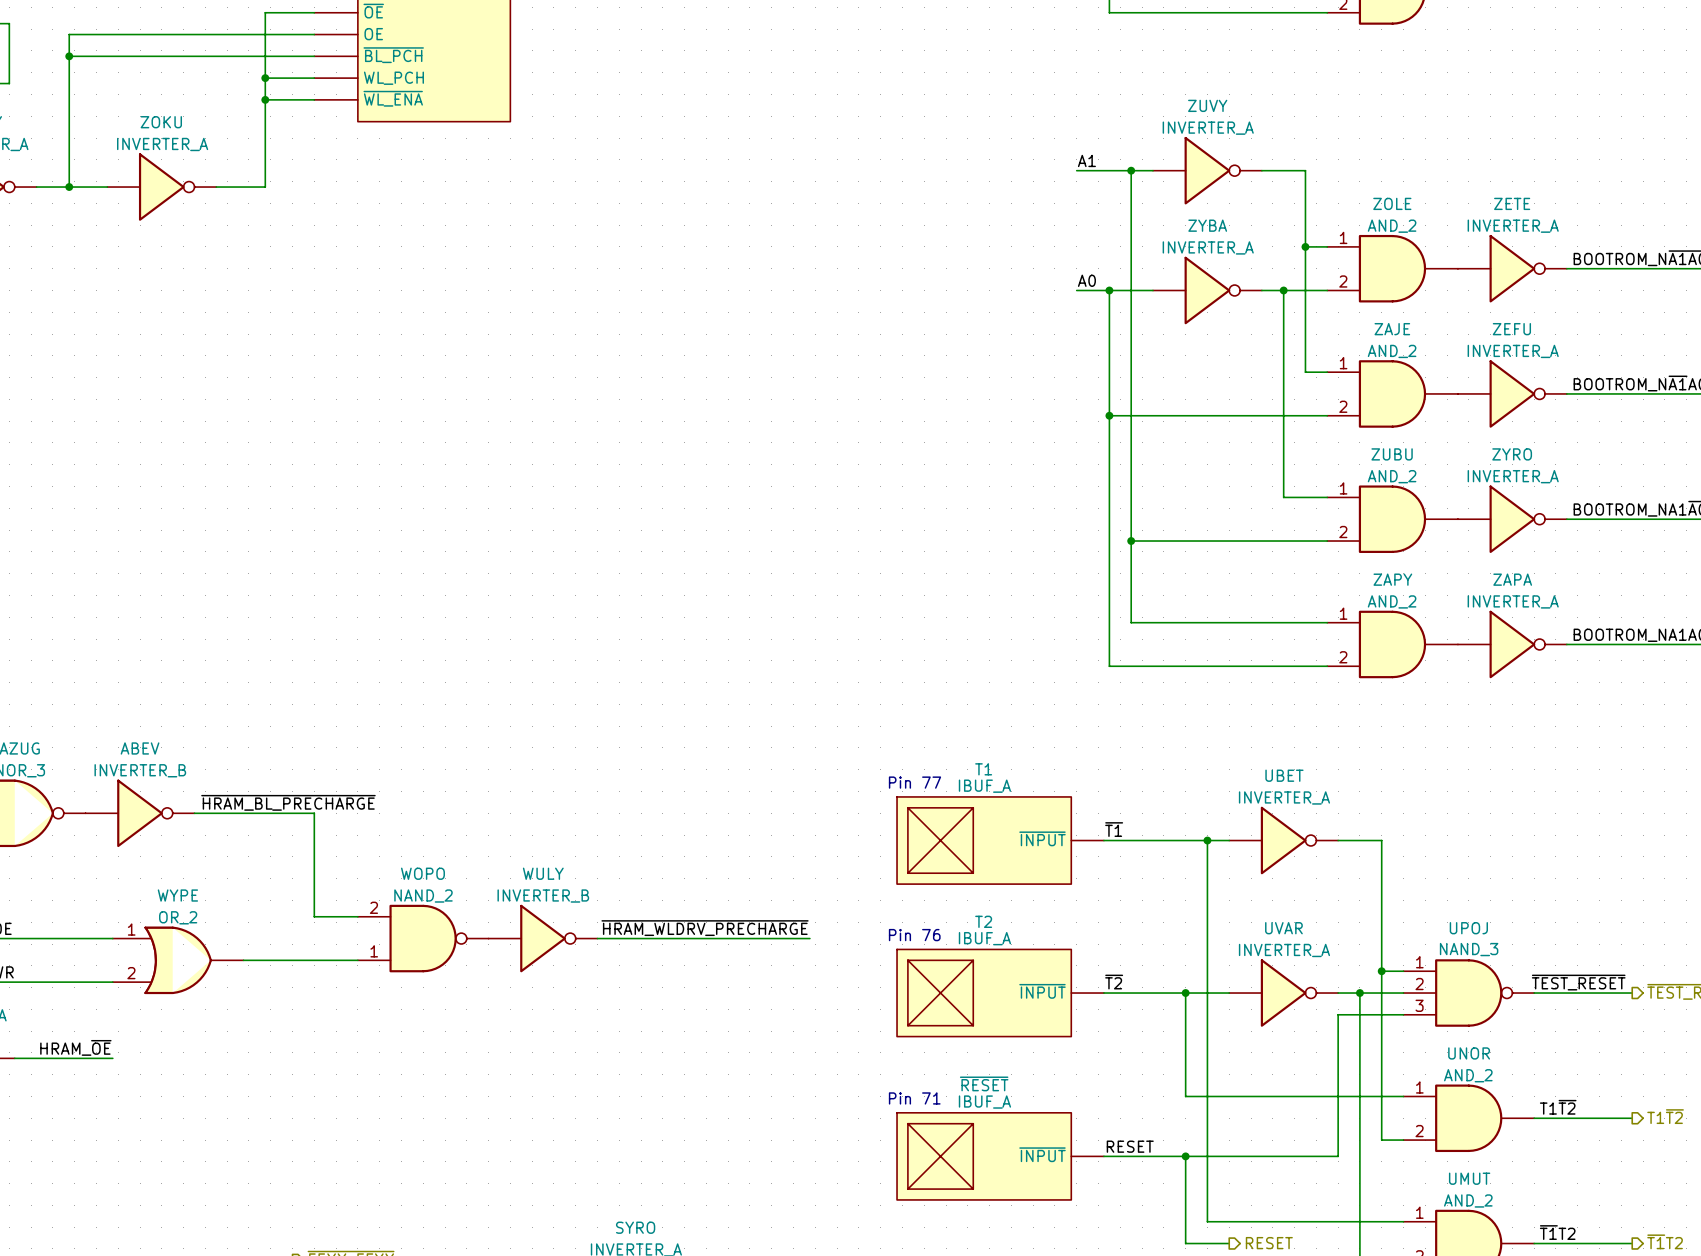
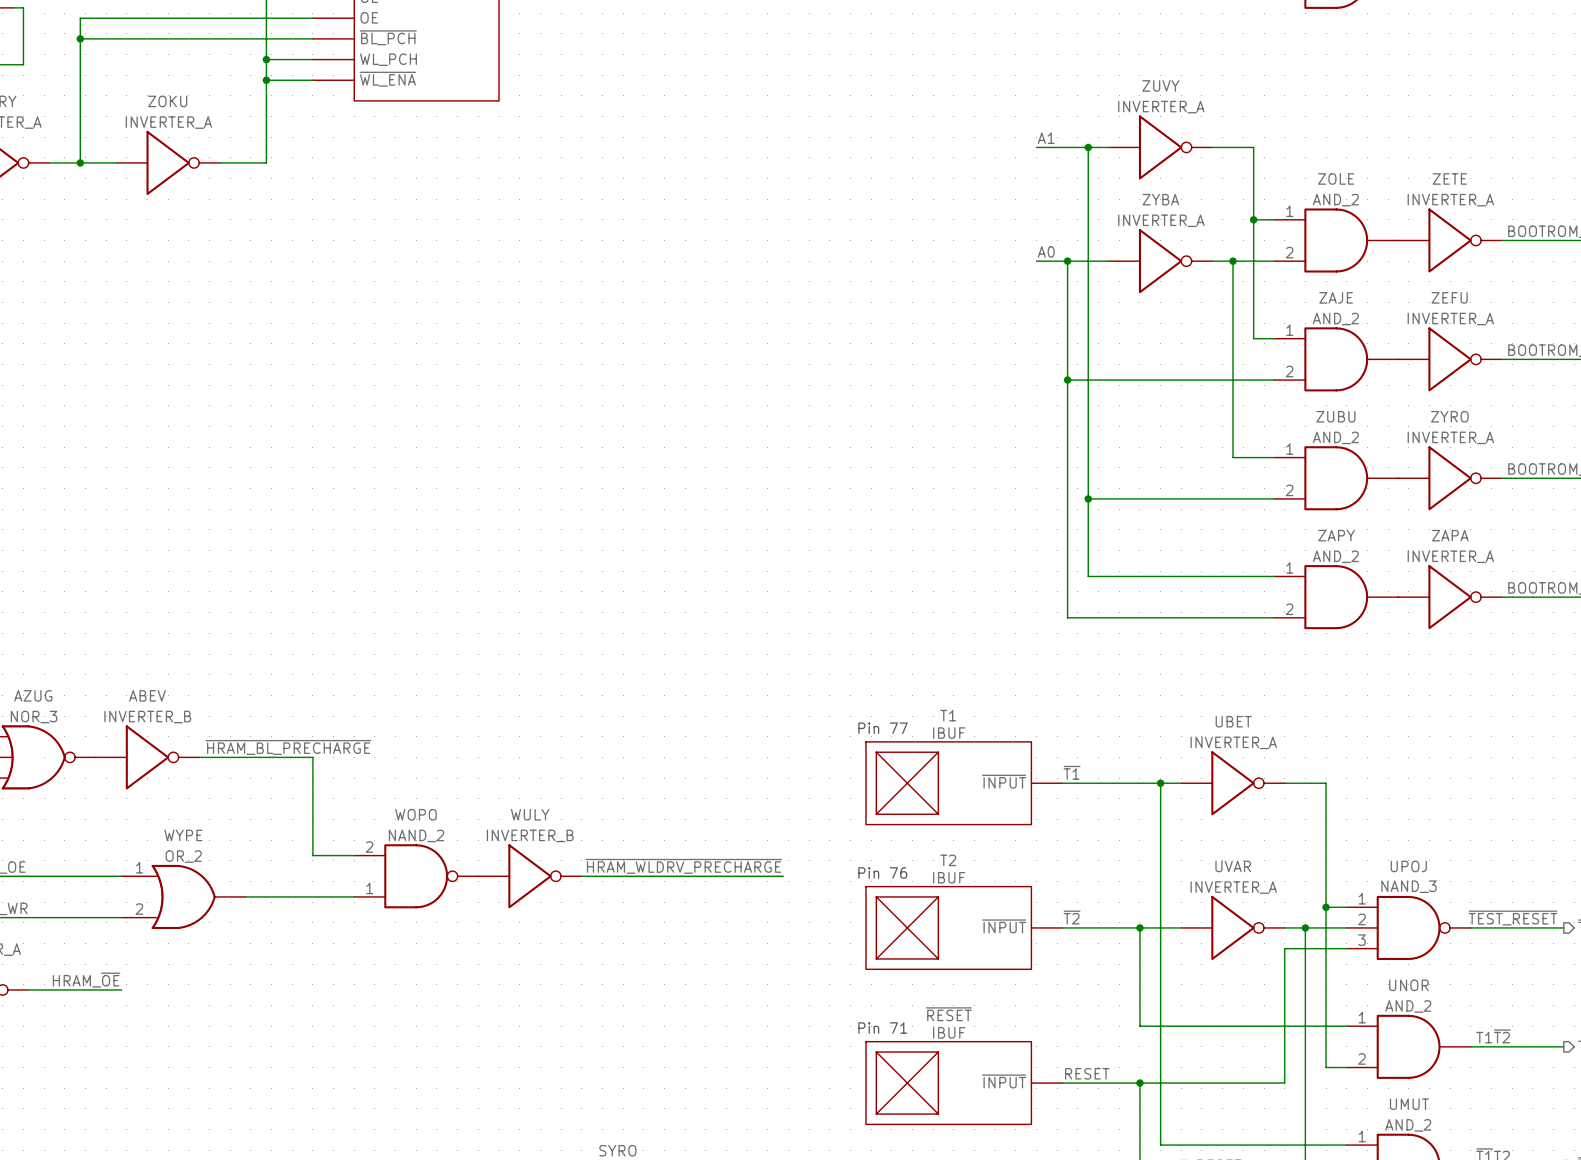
T1 value: IBUF_A (984, 786) -> IBUF (949, 733)
T2 value: IBUF_A (984, 938) -> IBUF (949, 877)
~{RESET} value: IBUF_A (984, 1102) -> IBUF (949, 1032)

